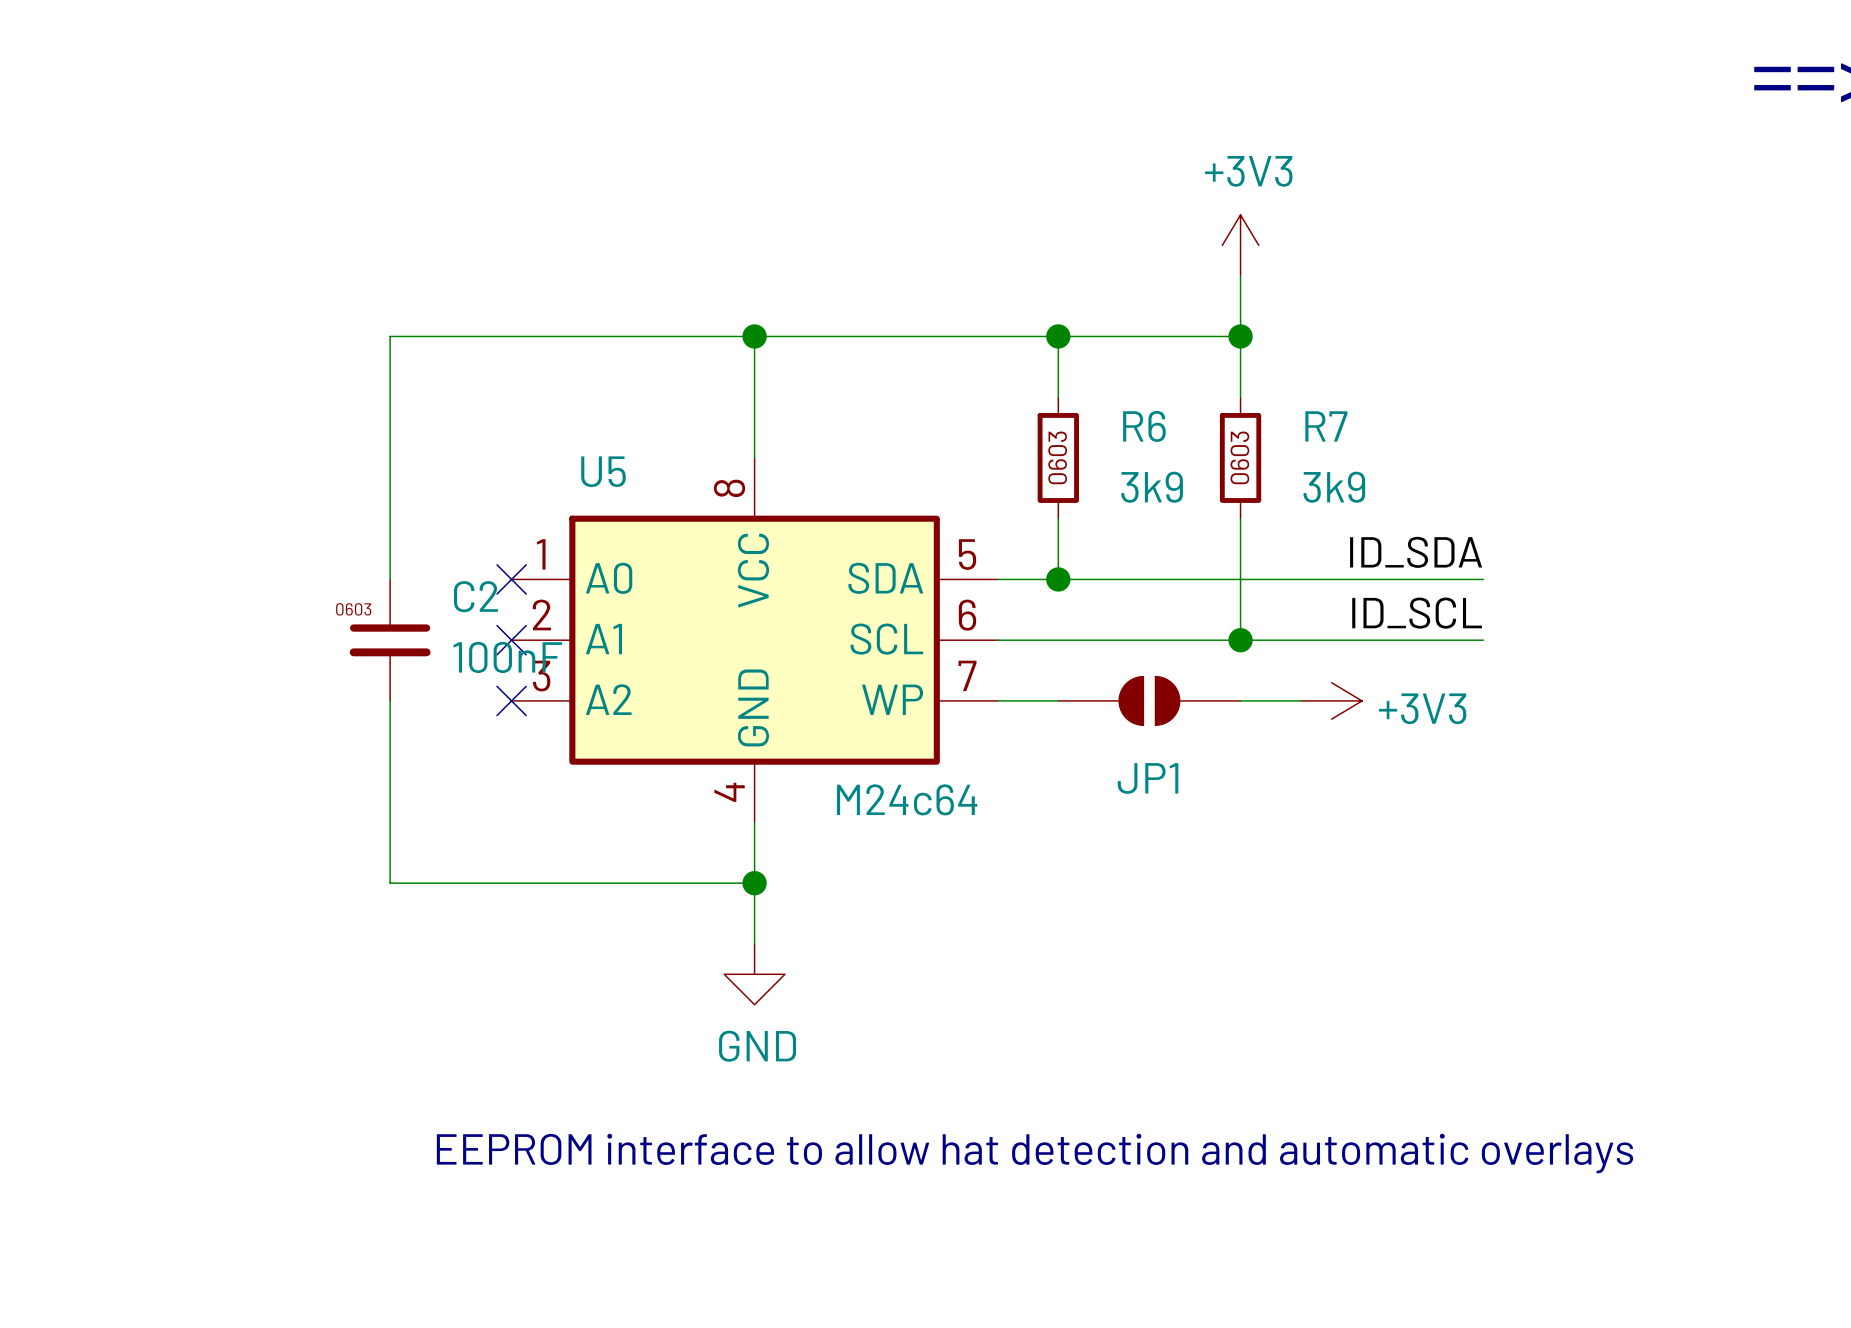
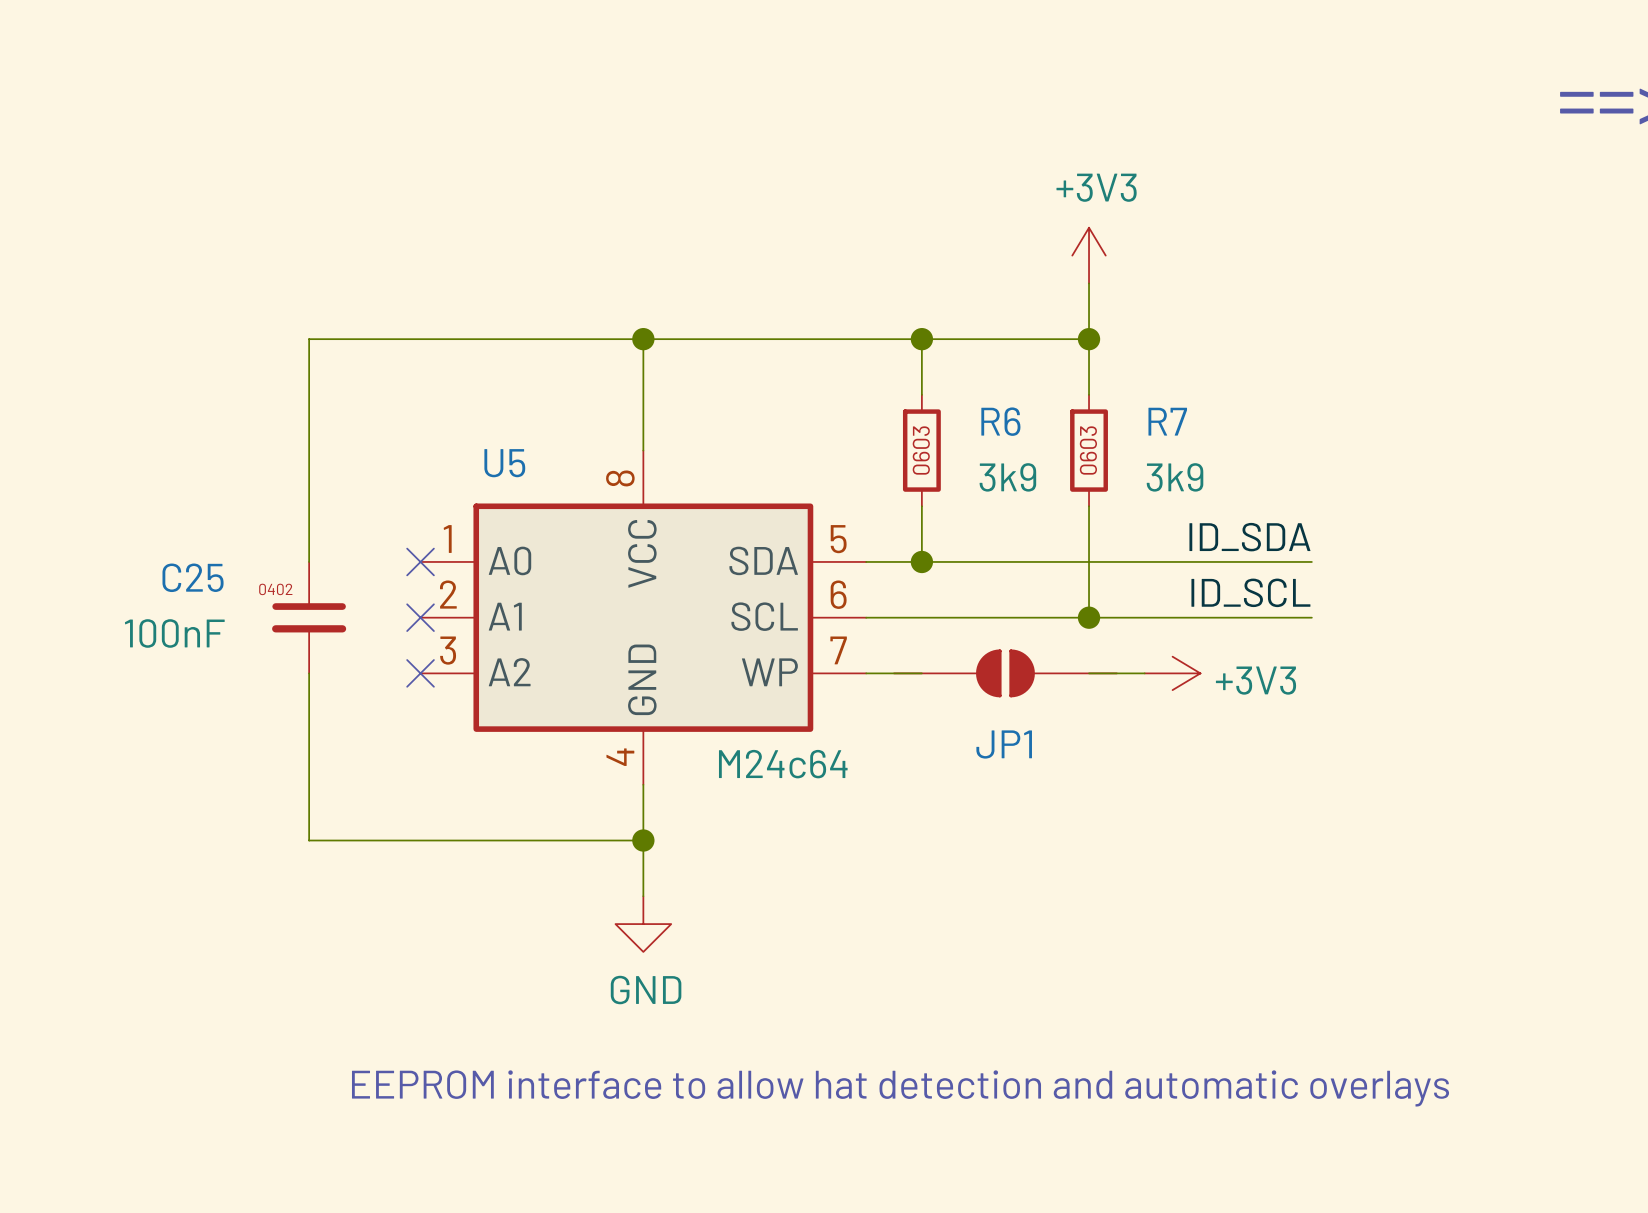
C2 name: C2 (475, 596) -> C25 (193, 577)
C2 text: 0603 (353, 609) -> 0402 (275, 589)
C2 value position: 100nF (507, 657) -> 100nF (174, 633)
JP1 symbol: [1058, 676, 1241, 726] -> [894, 649, 1117, 698]

